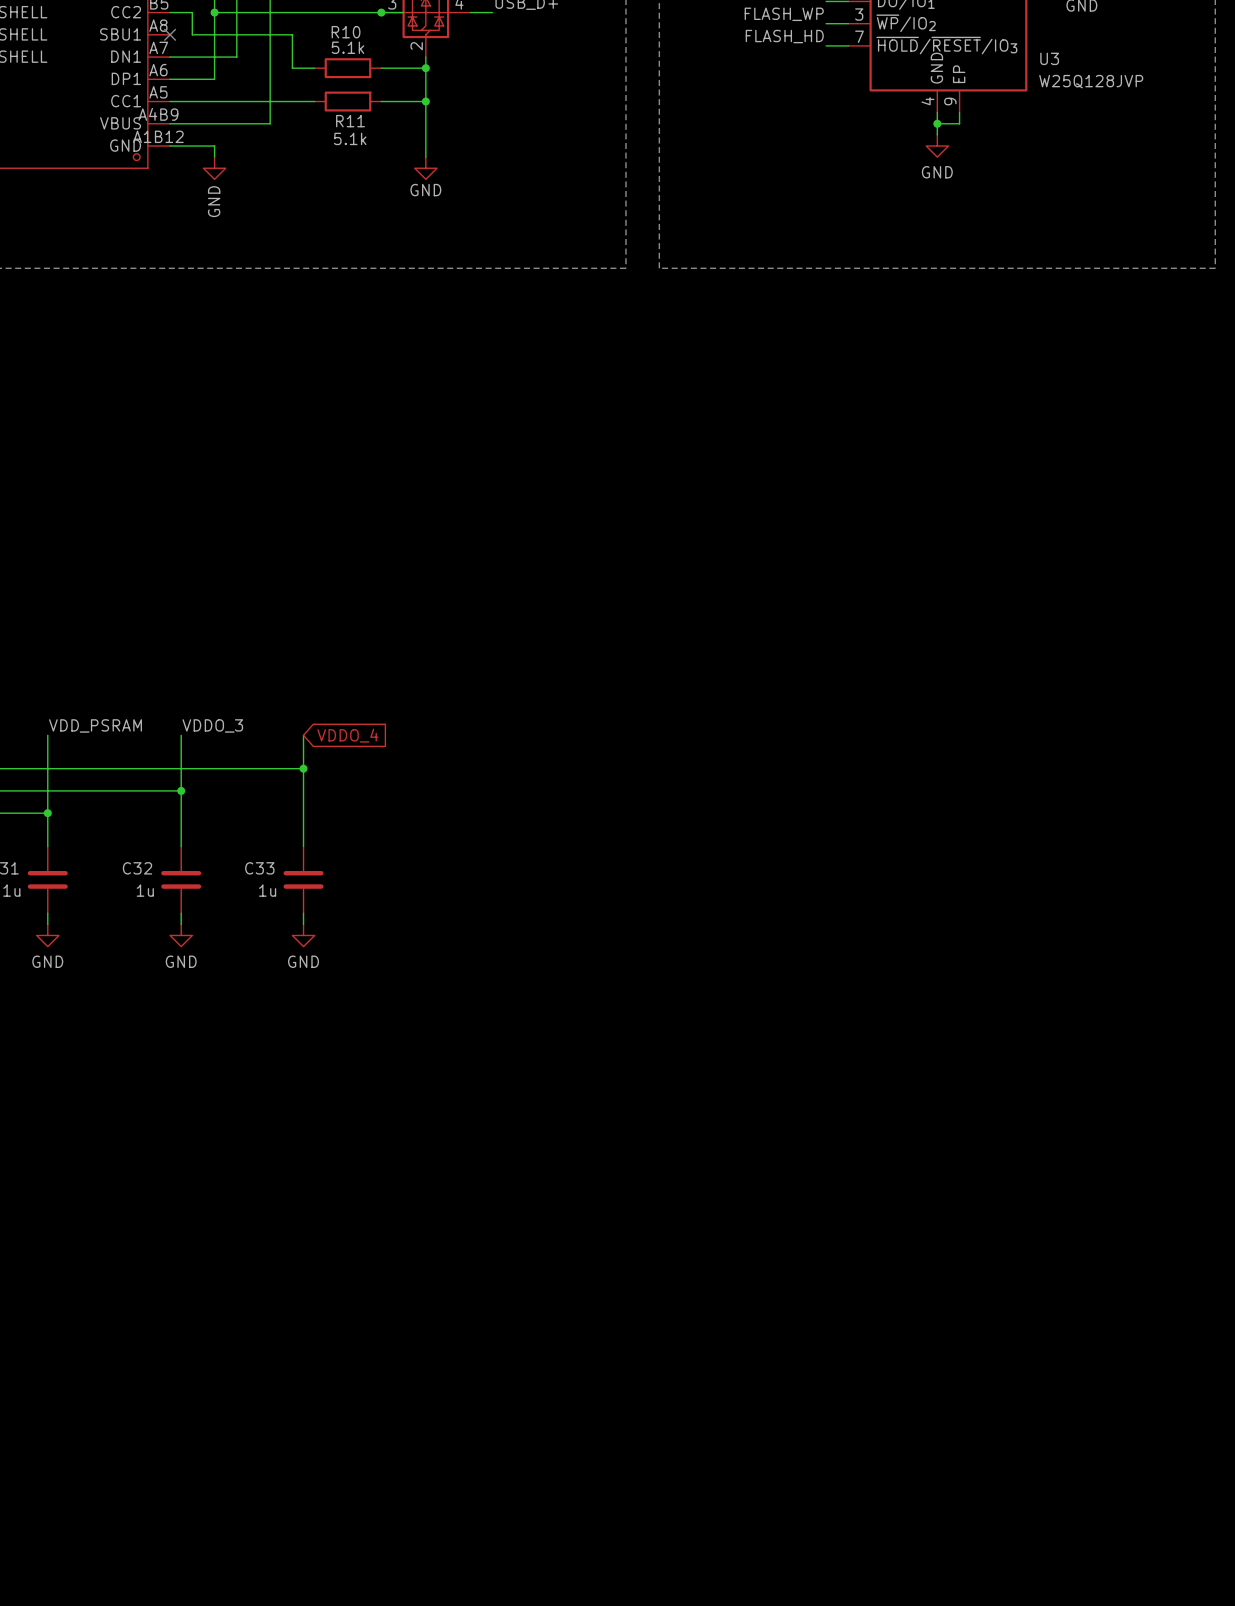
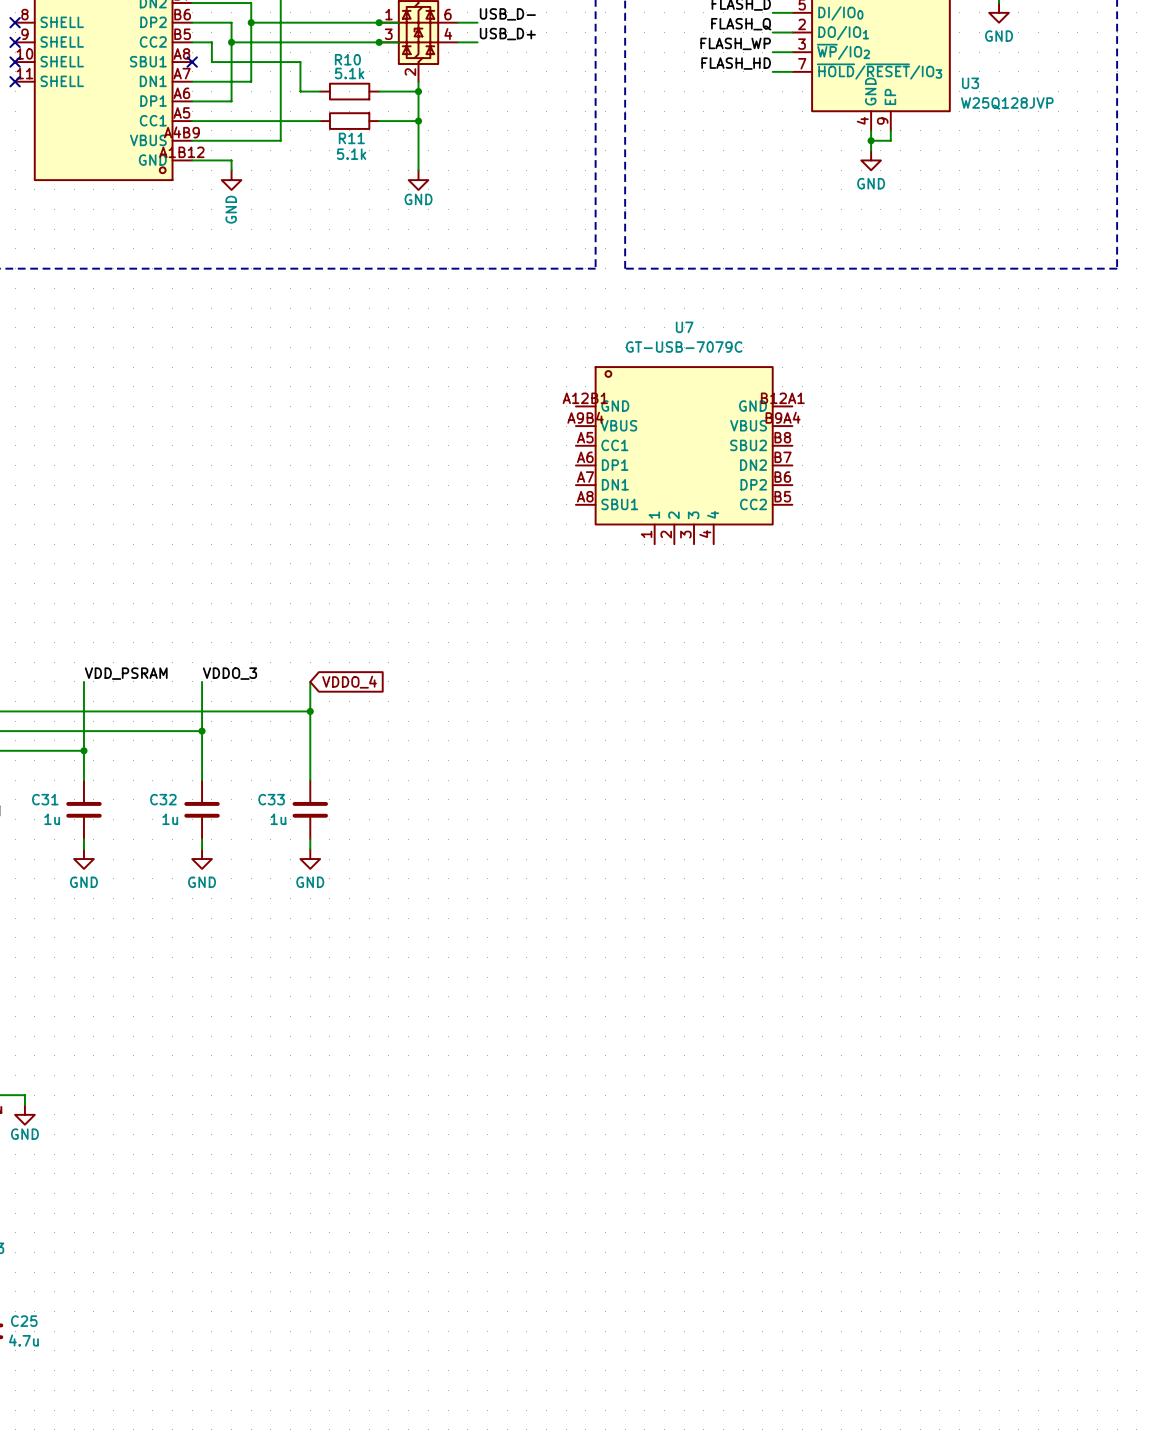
U7: none -> GT-USB-7079C (684, 455)

